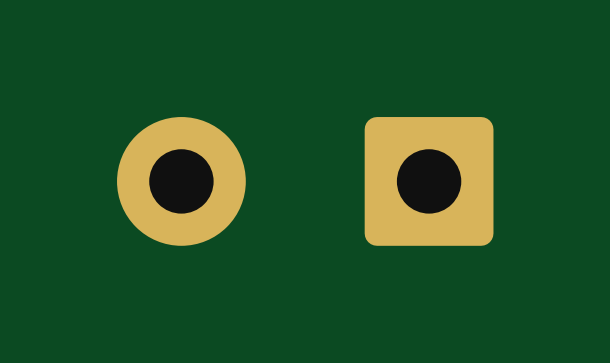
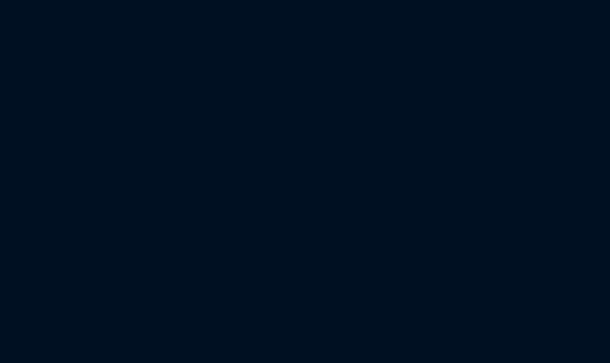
part: (305, 181) -> none

